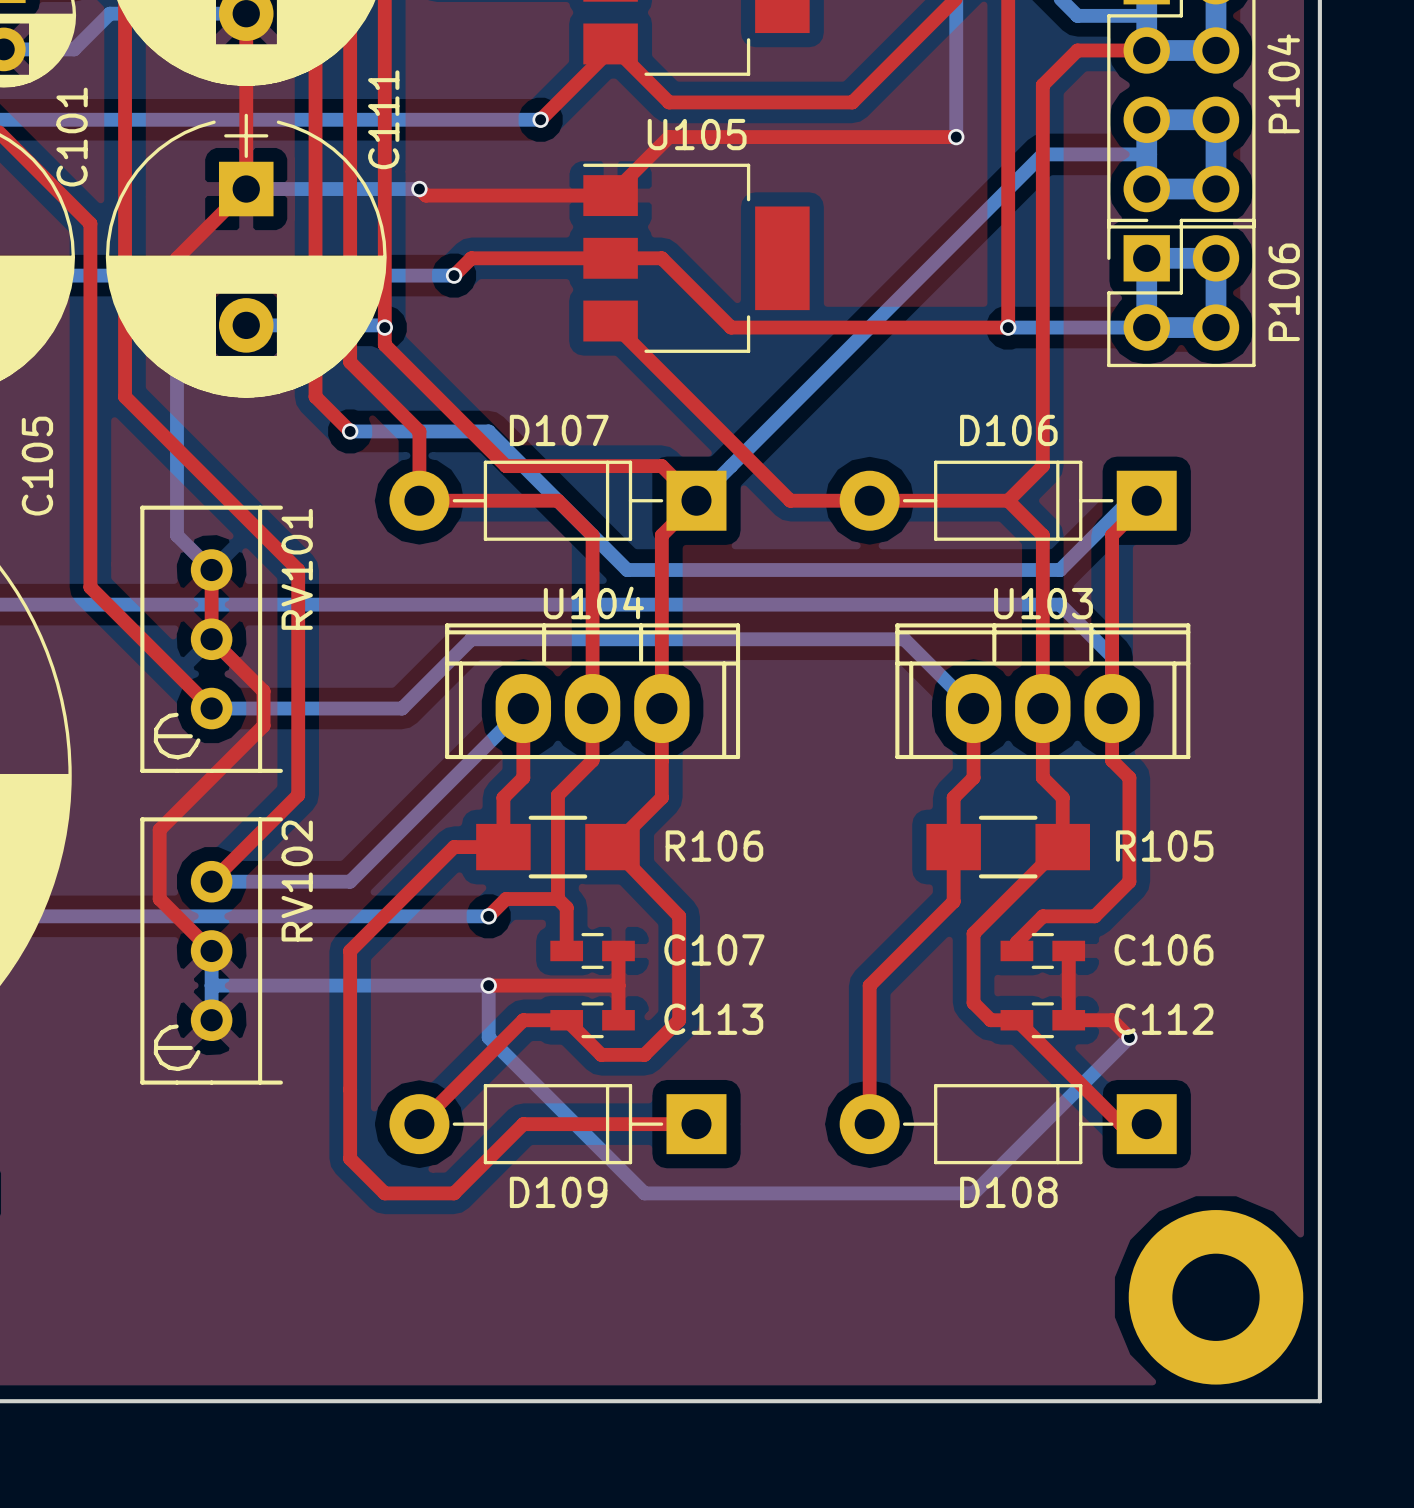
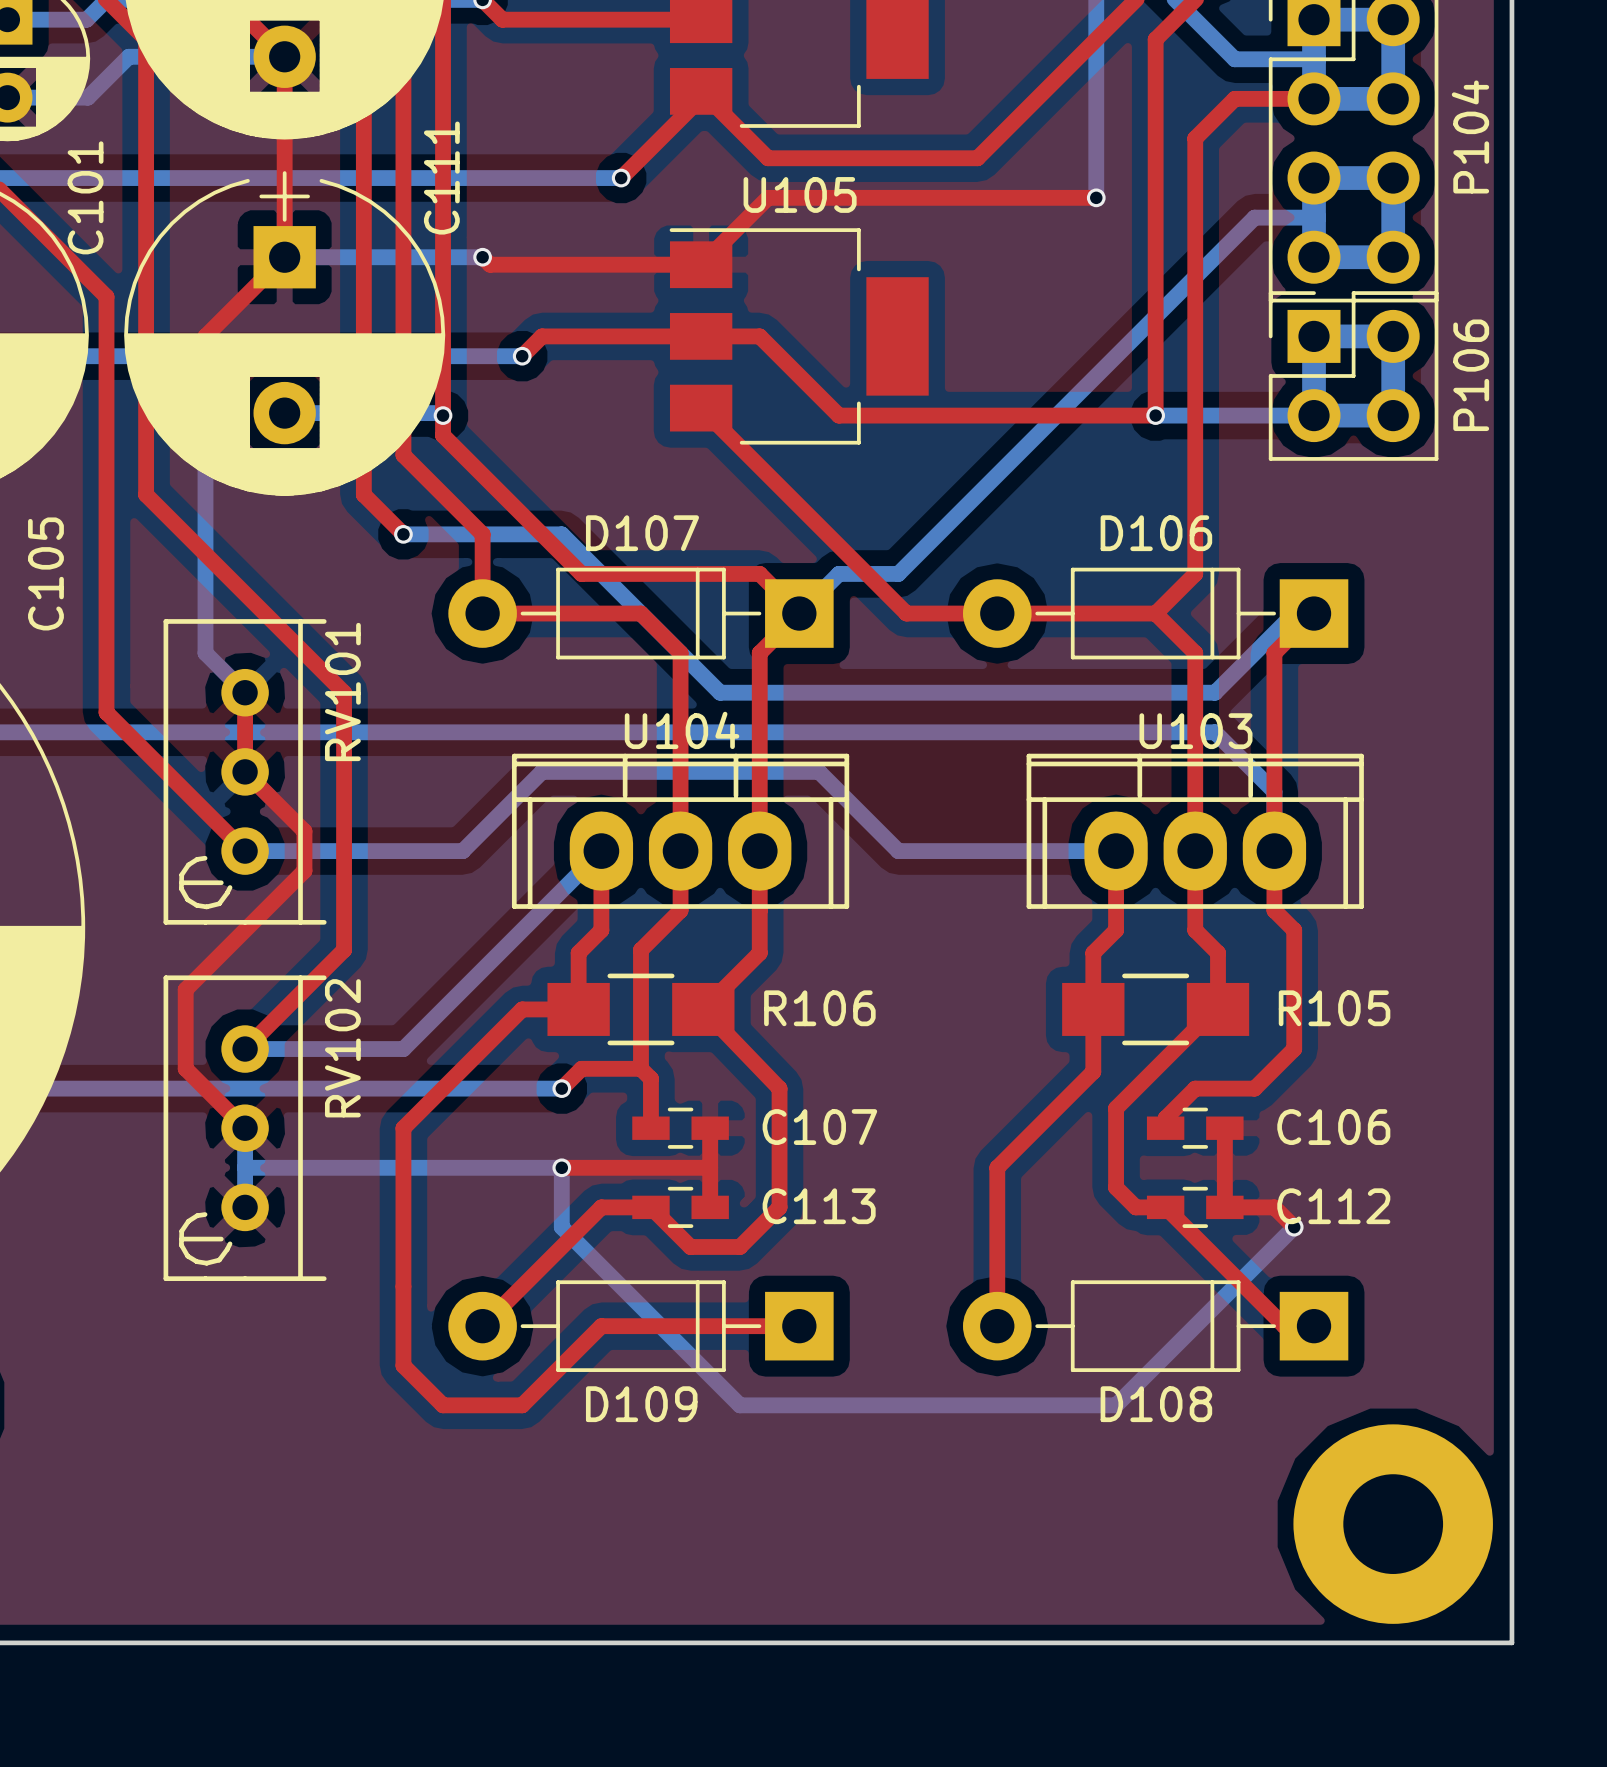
bottom track: (1094, 154) (1042, 154) (731, 466) -> (1254, 217) (898, 573) (838, 573)
bottom track: (713, 639) (904, 639) (973, 708) -> (819, 771) (898, 851) (1116, 851)

